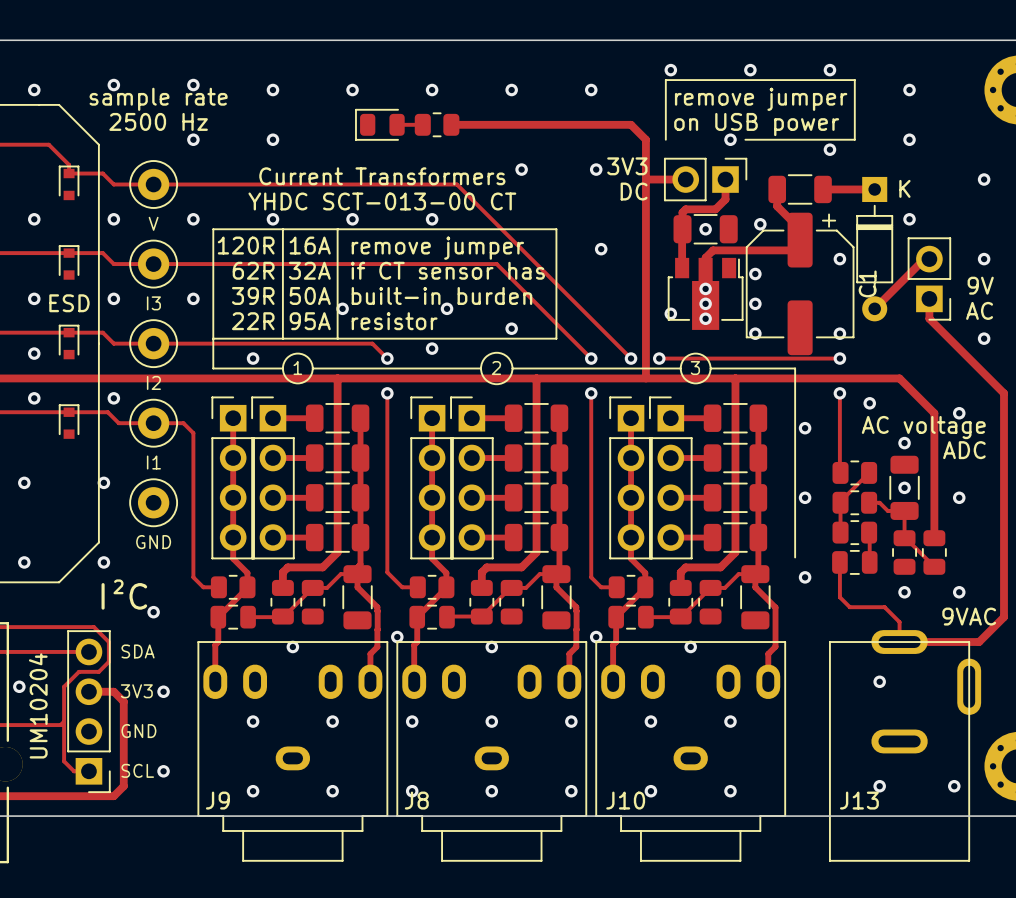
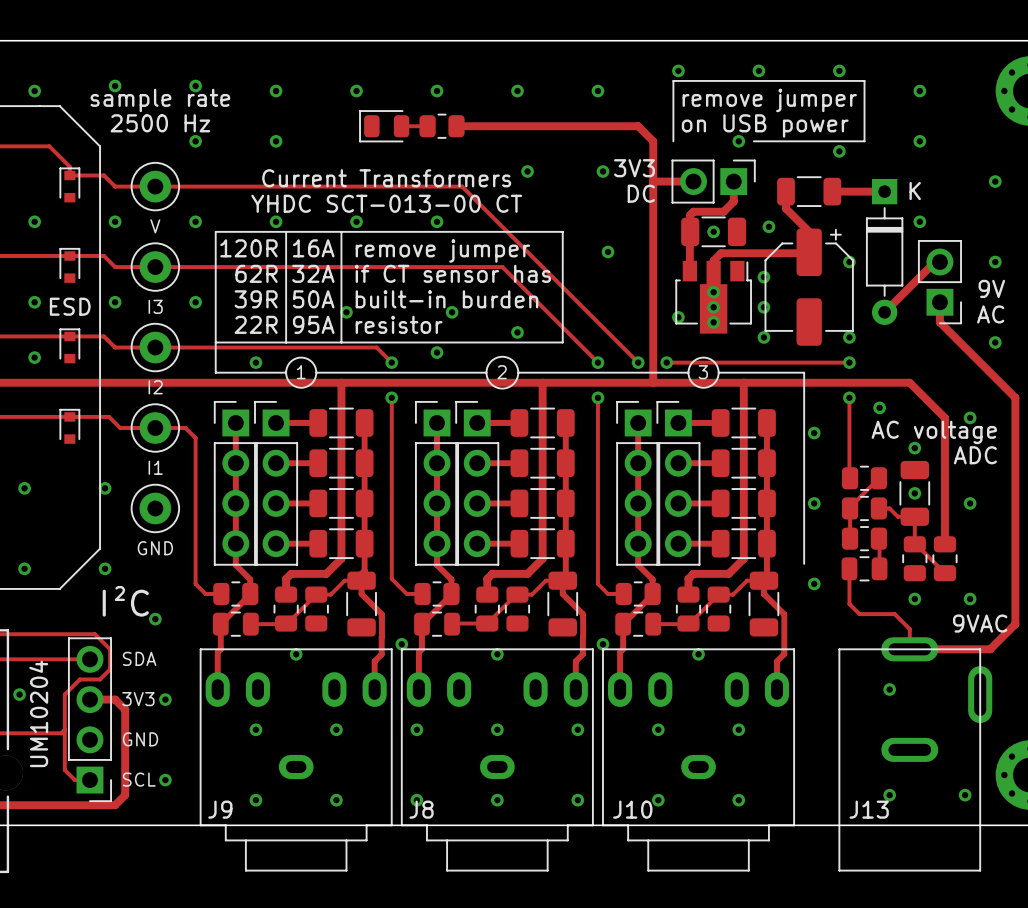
C1: (800, 283) -> none
part: none -> (809, 287)
via: (34, 398) -> none
via: (113, 398) -> none

